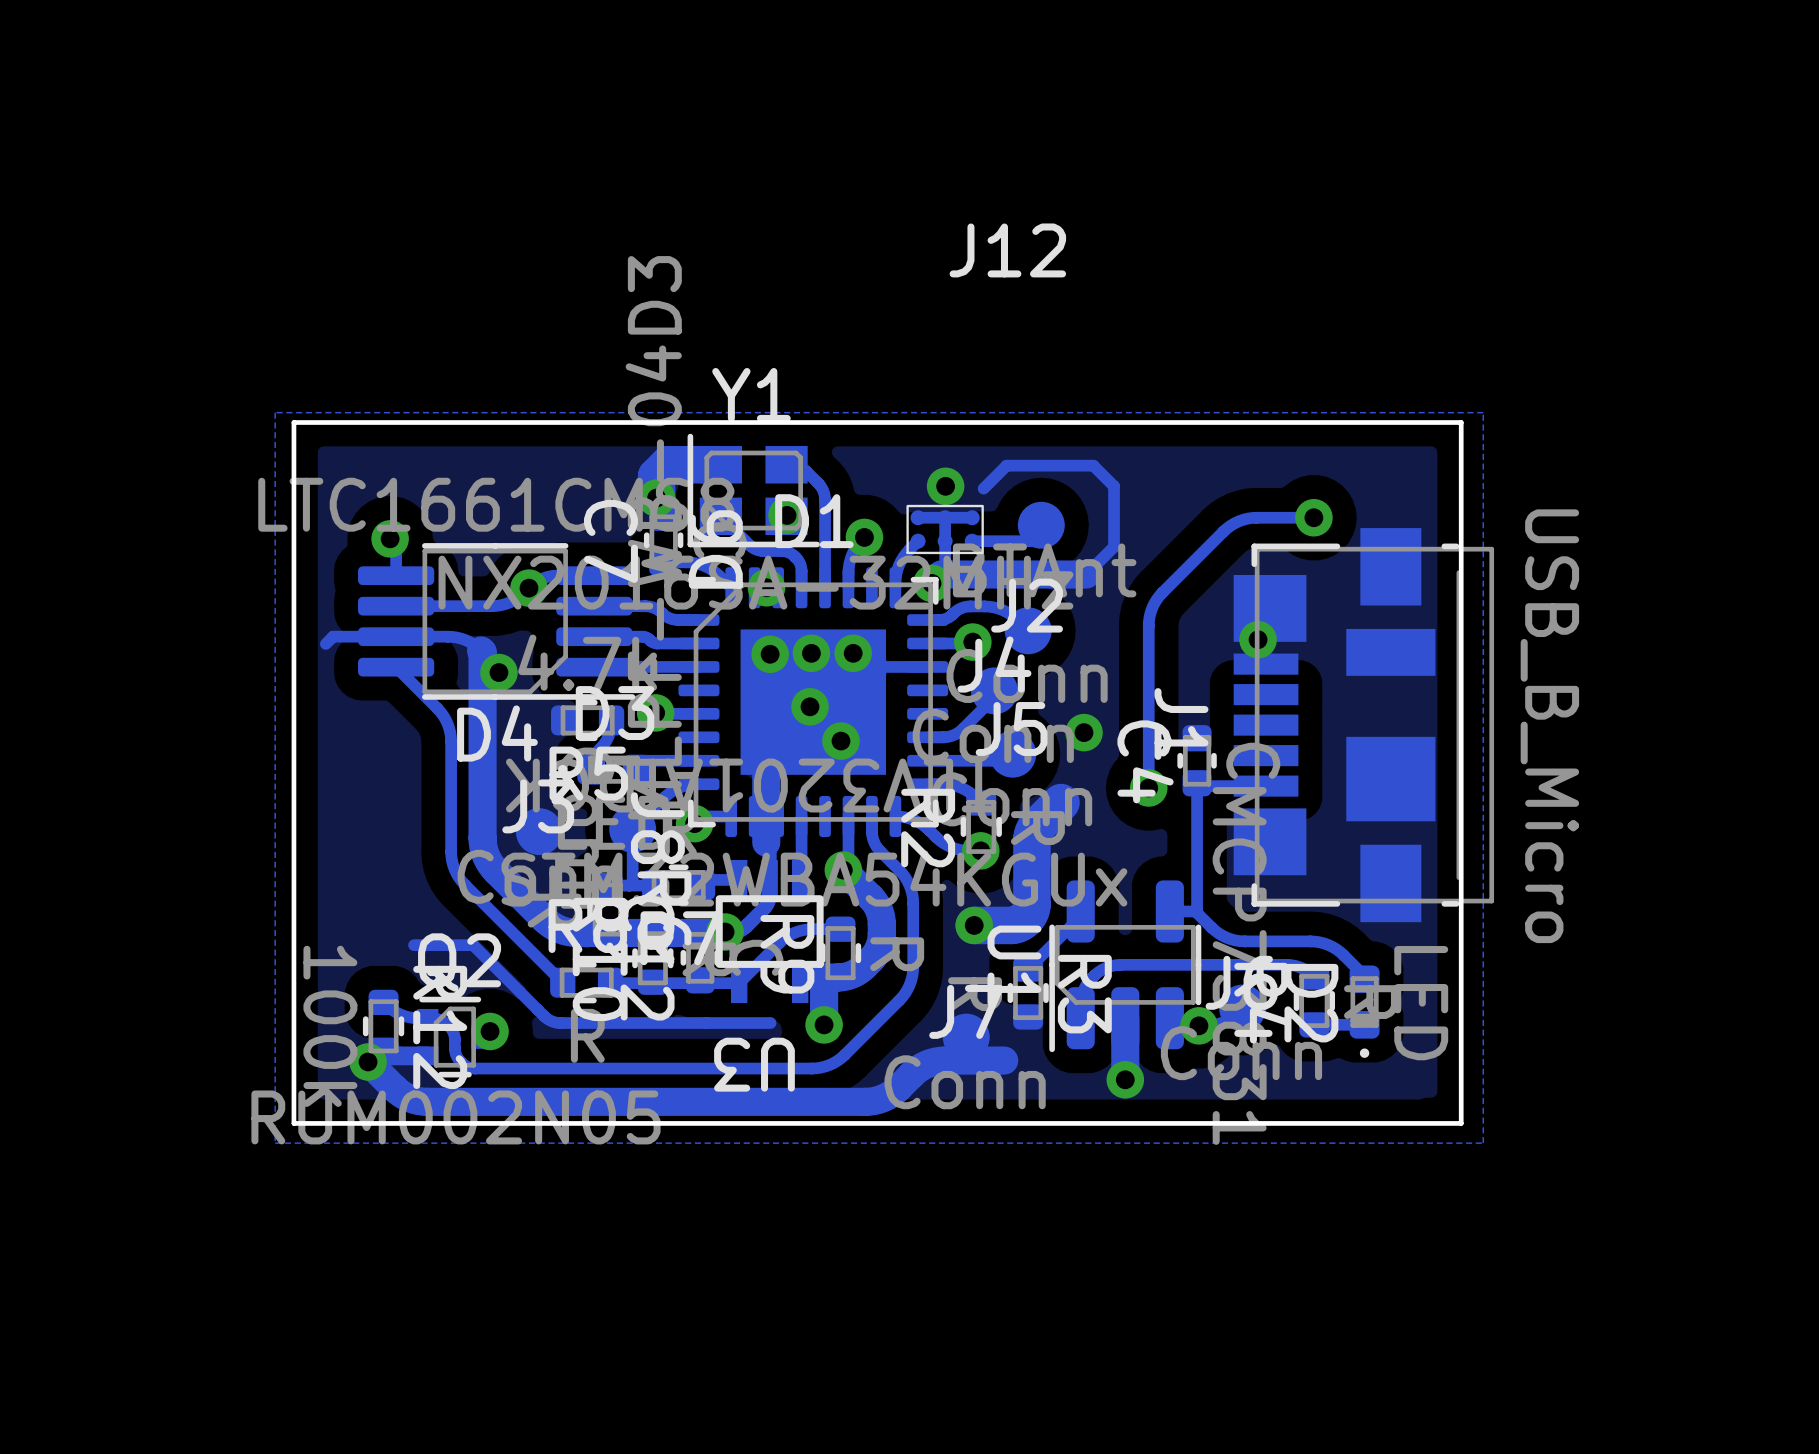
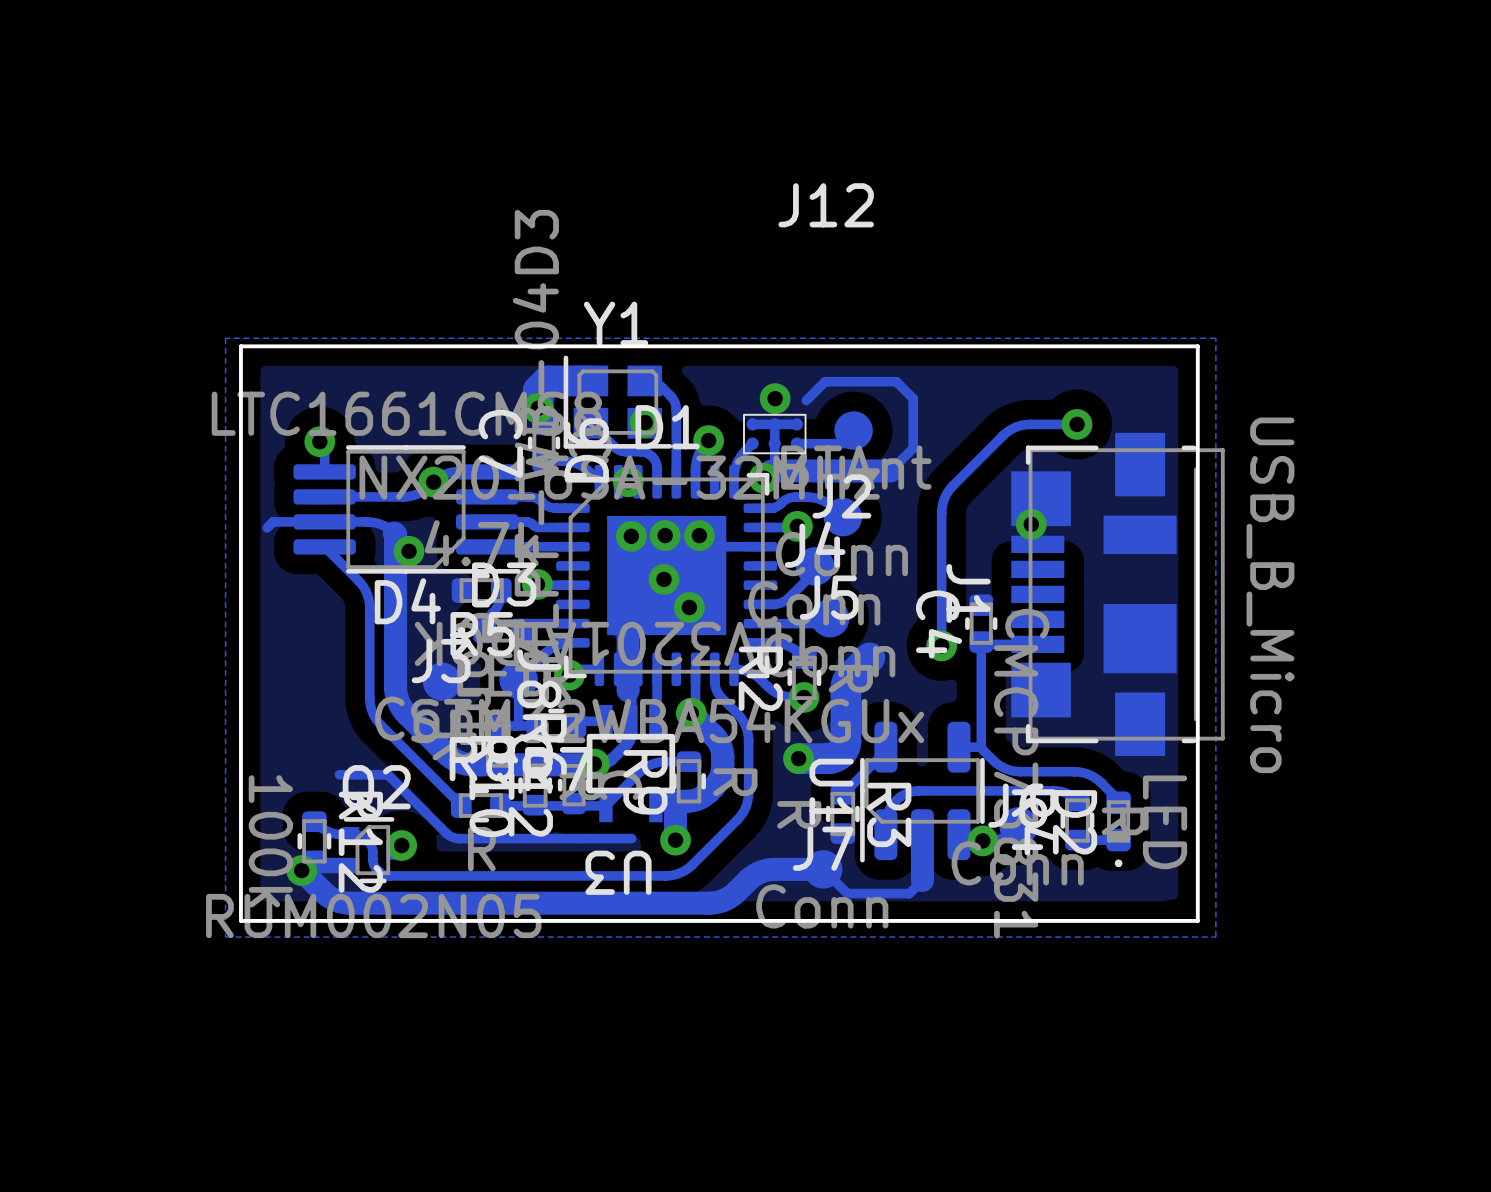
via: (1084, 732) -> none
J7 position: (966, 1037) -> (823, 869)
track: none -> (823, 869) (847, 893) (909, 893) (922, 880)
via: (1125, 1079) -> none

